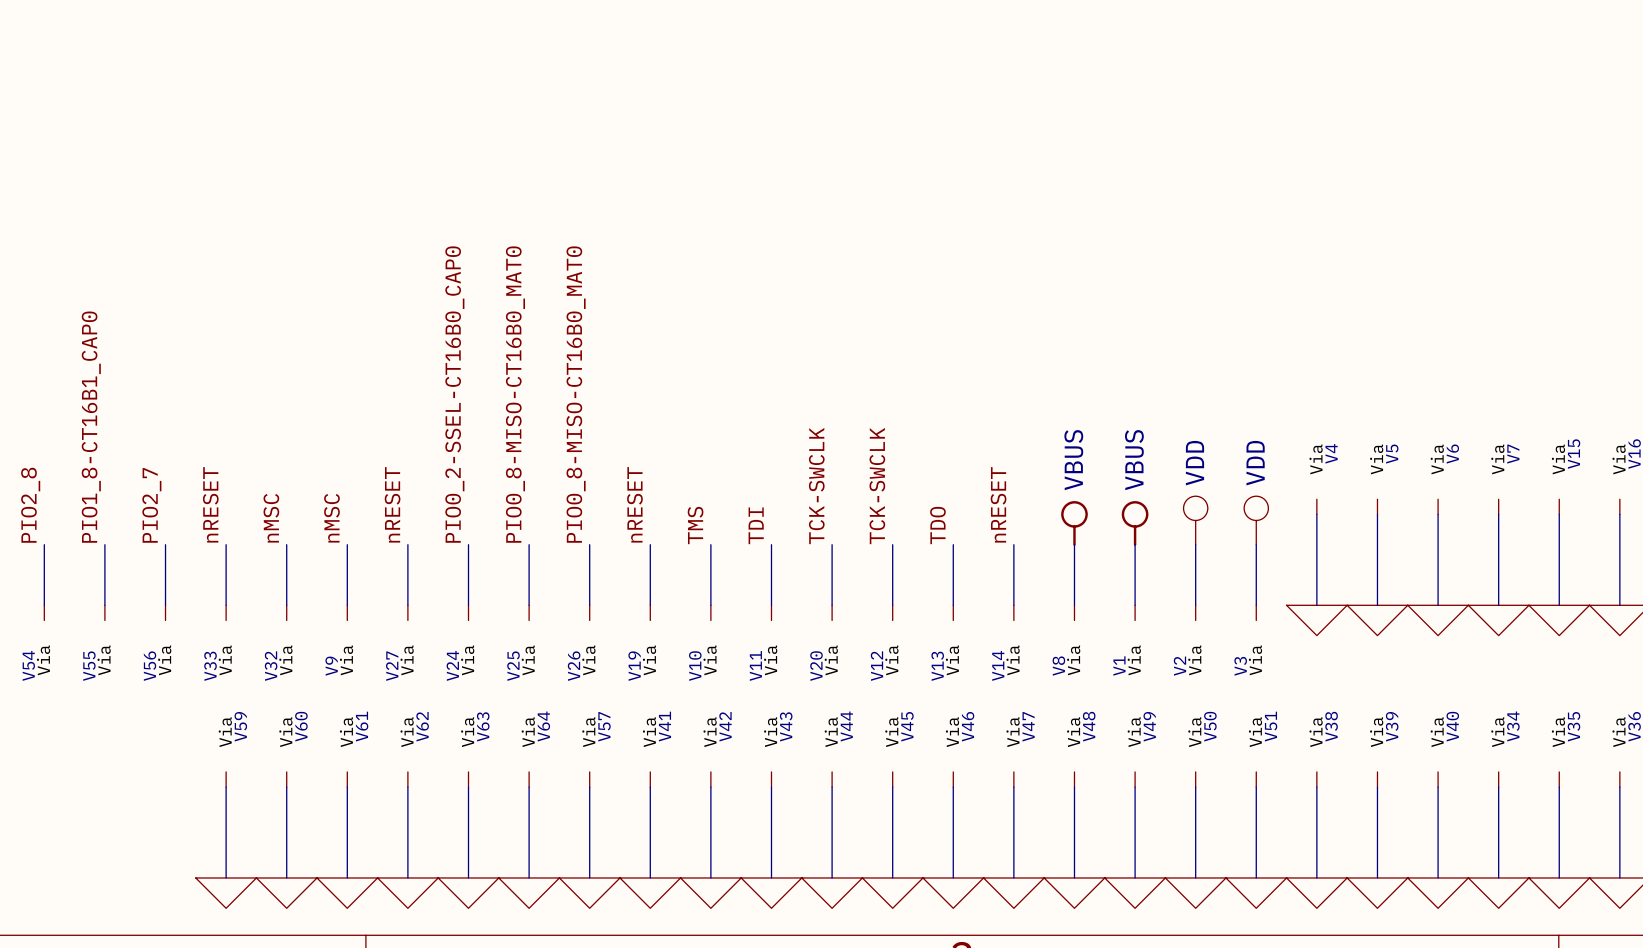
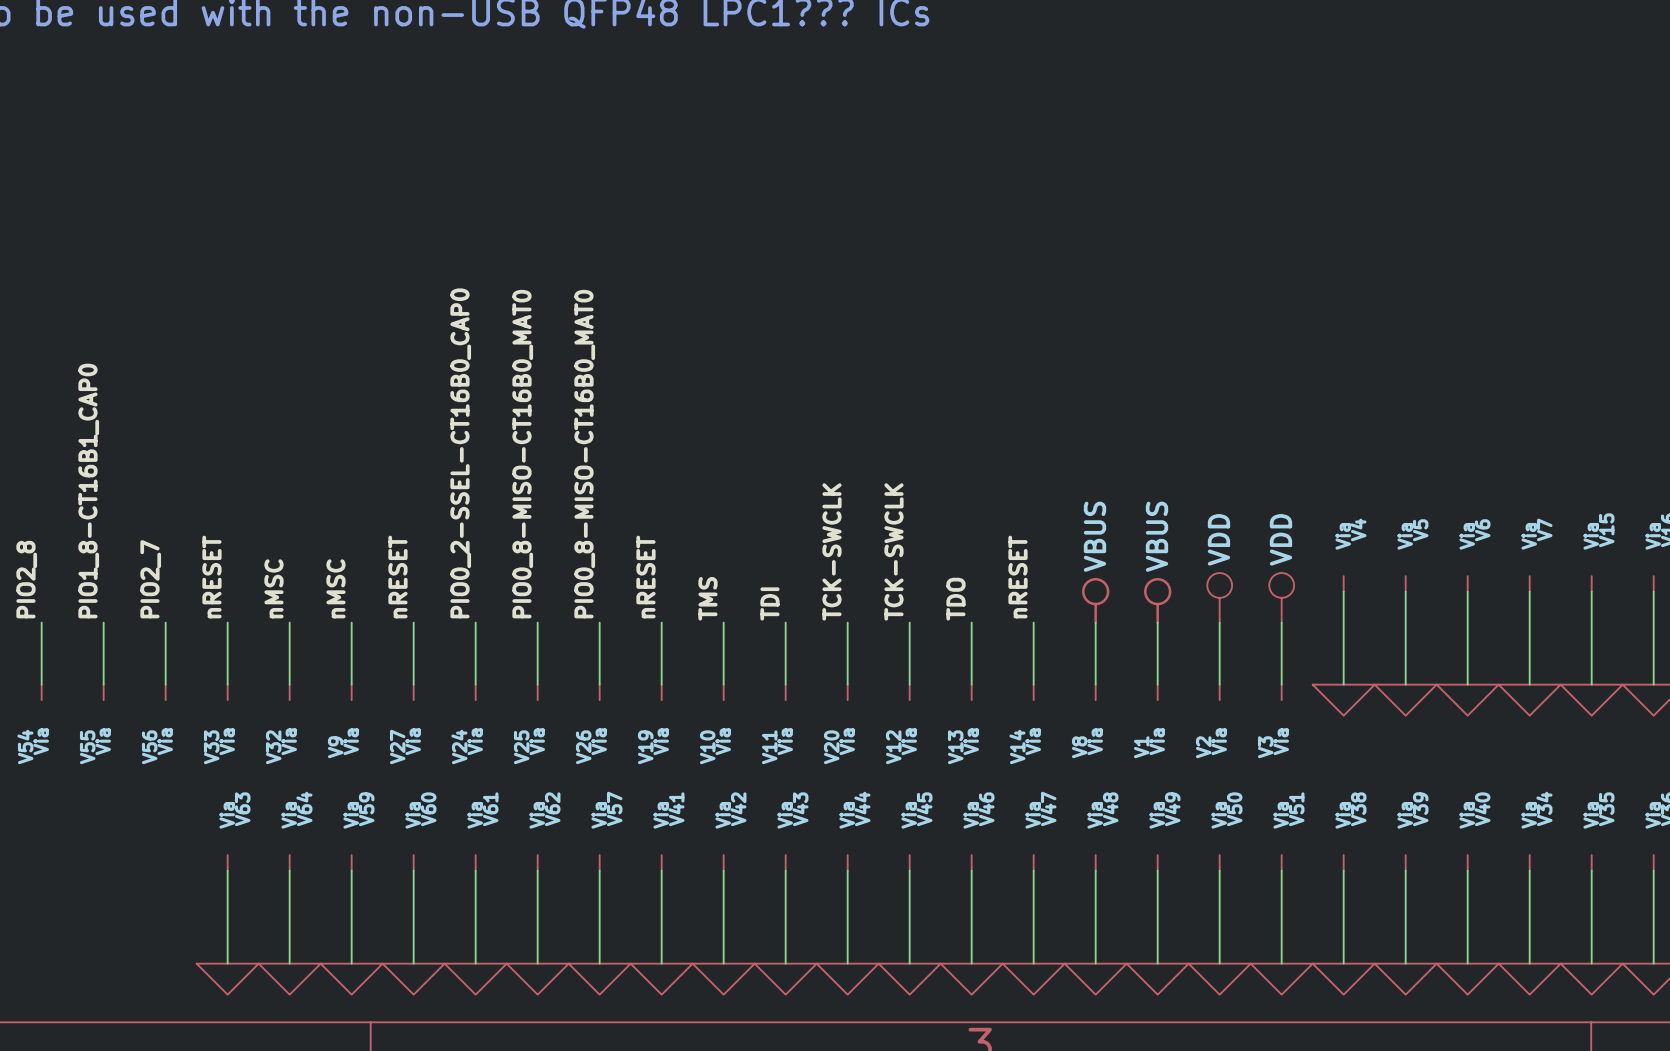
V59 name: V59 (240, 726) -> V63 (242, 809)
V60 name: V60 (301, 726) -> V64 (304, 808)
V61 name: V61 (362, 726) -> V59 (366, 809)
V62 name: V62 (422, 726) -> V60 (428, 809)
V63 name: V63 (483, 726) -> V61 (490, 809)
V64 name: V64 (543, 726) -> V62 (552, 809)

